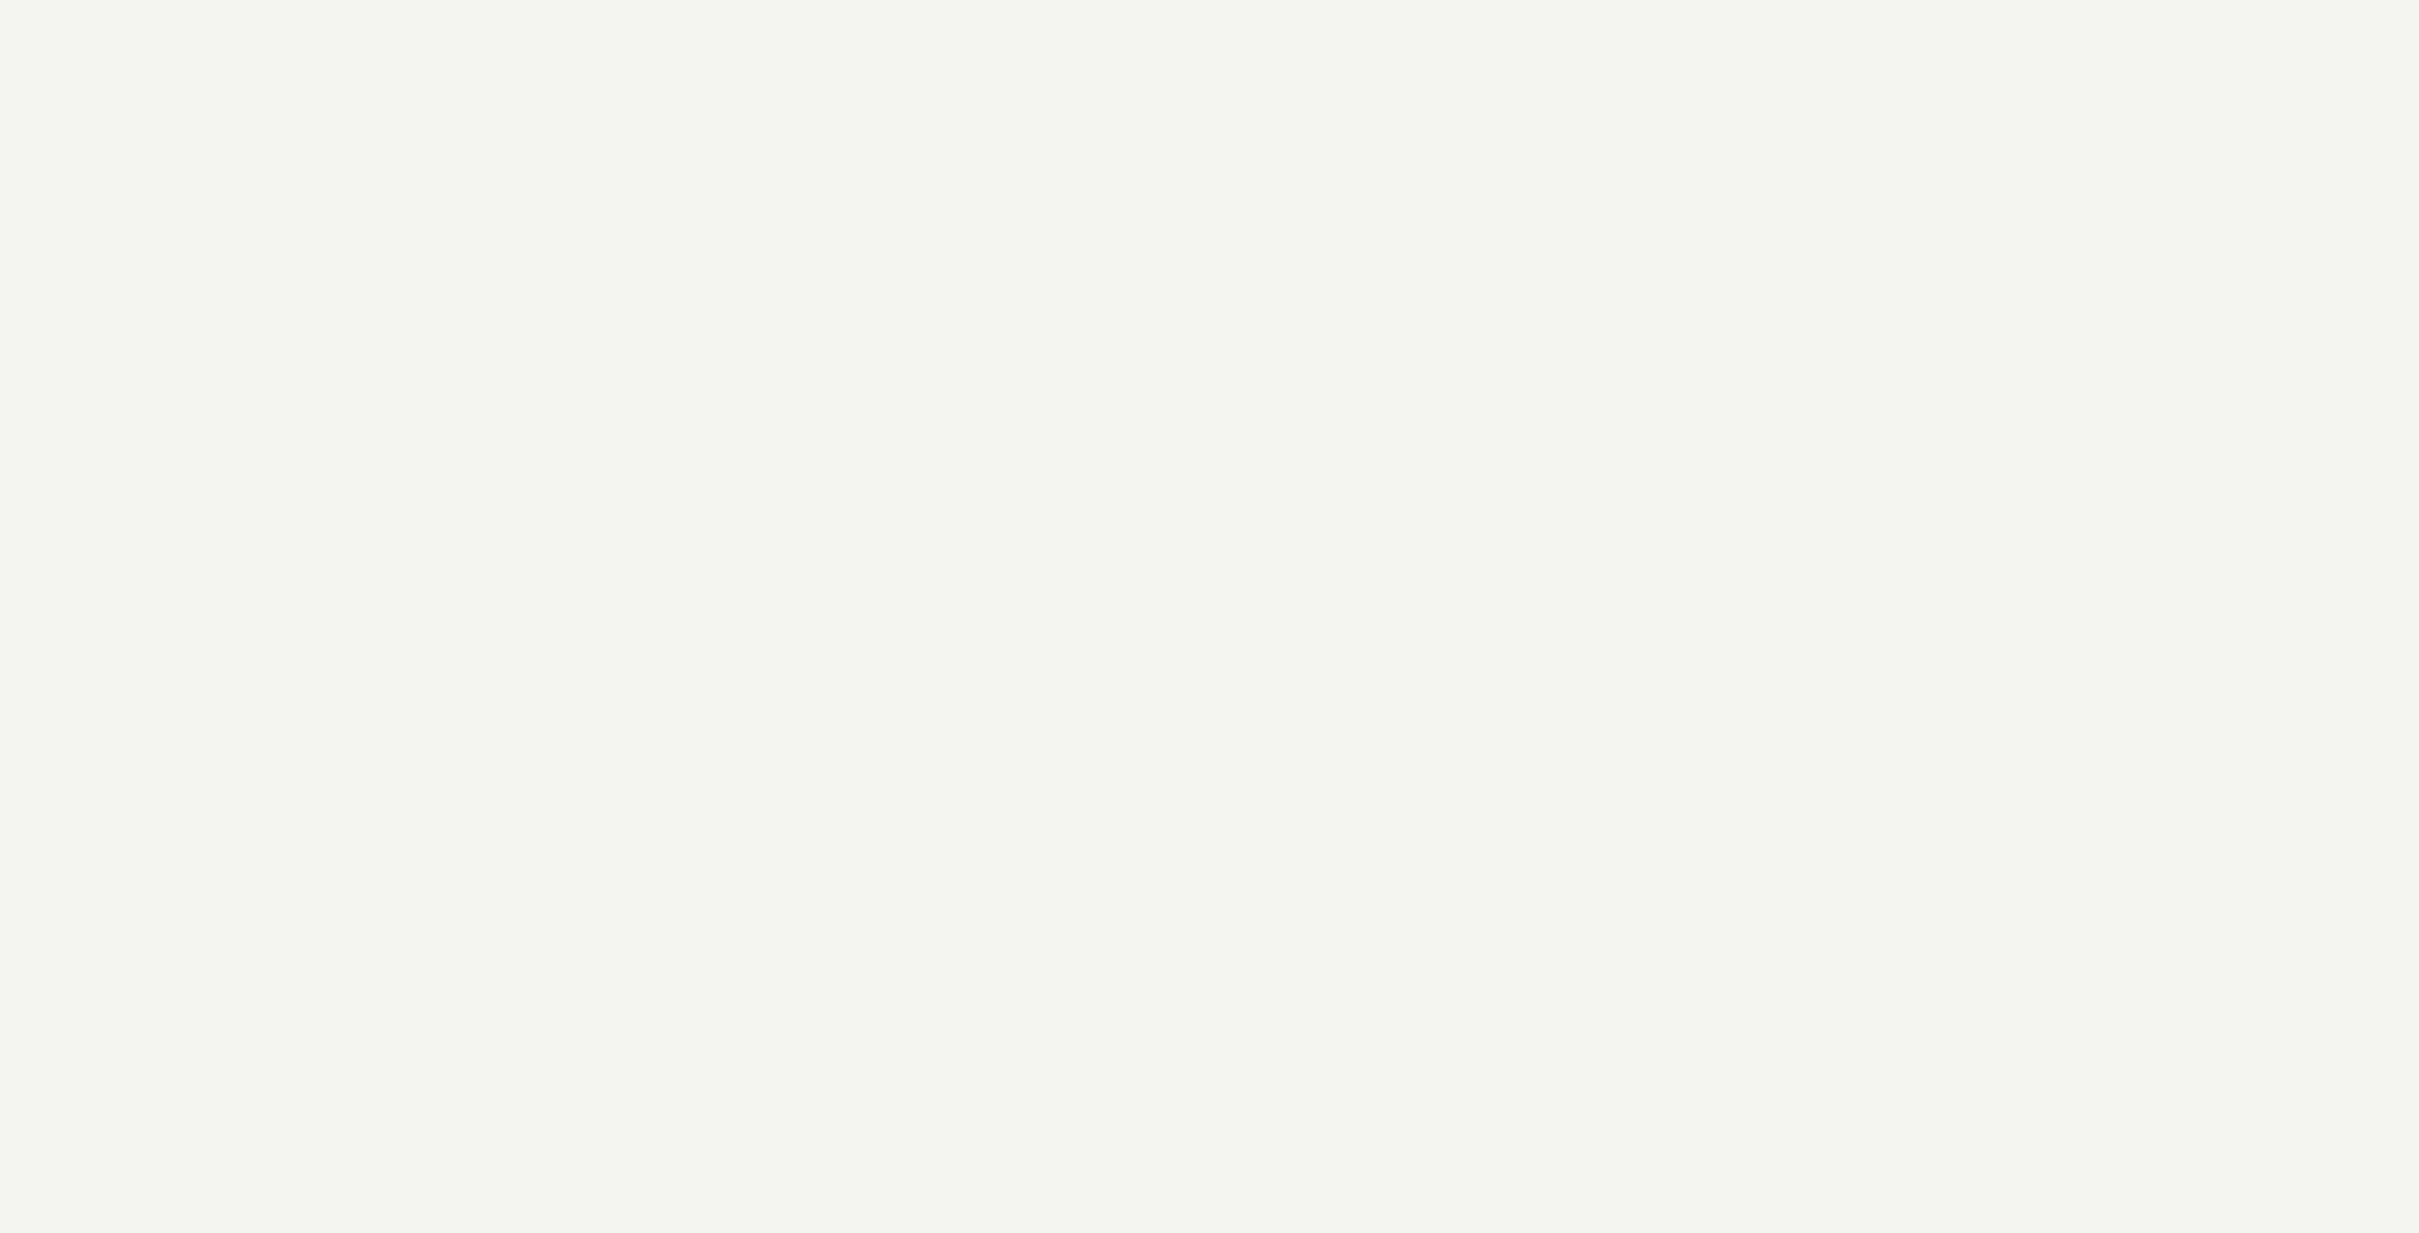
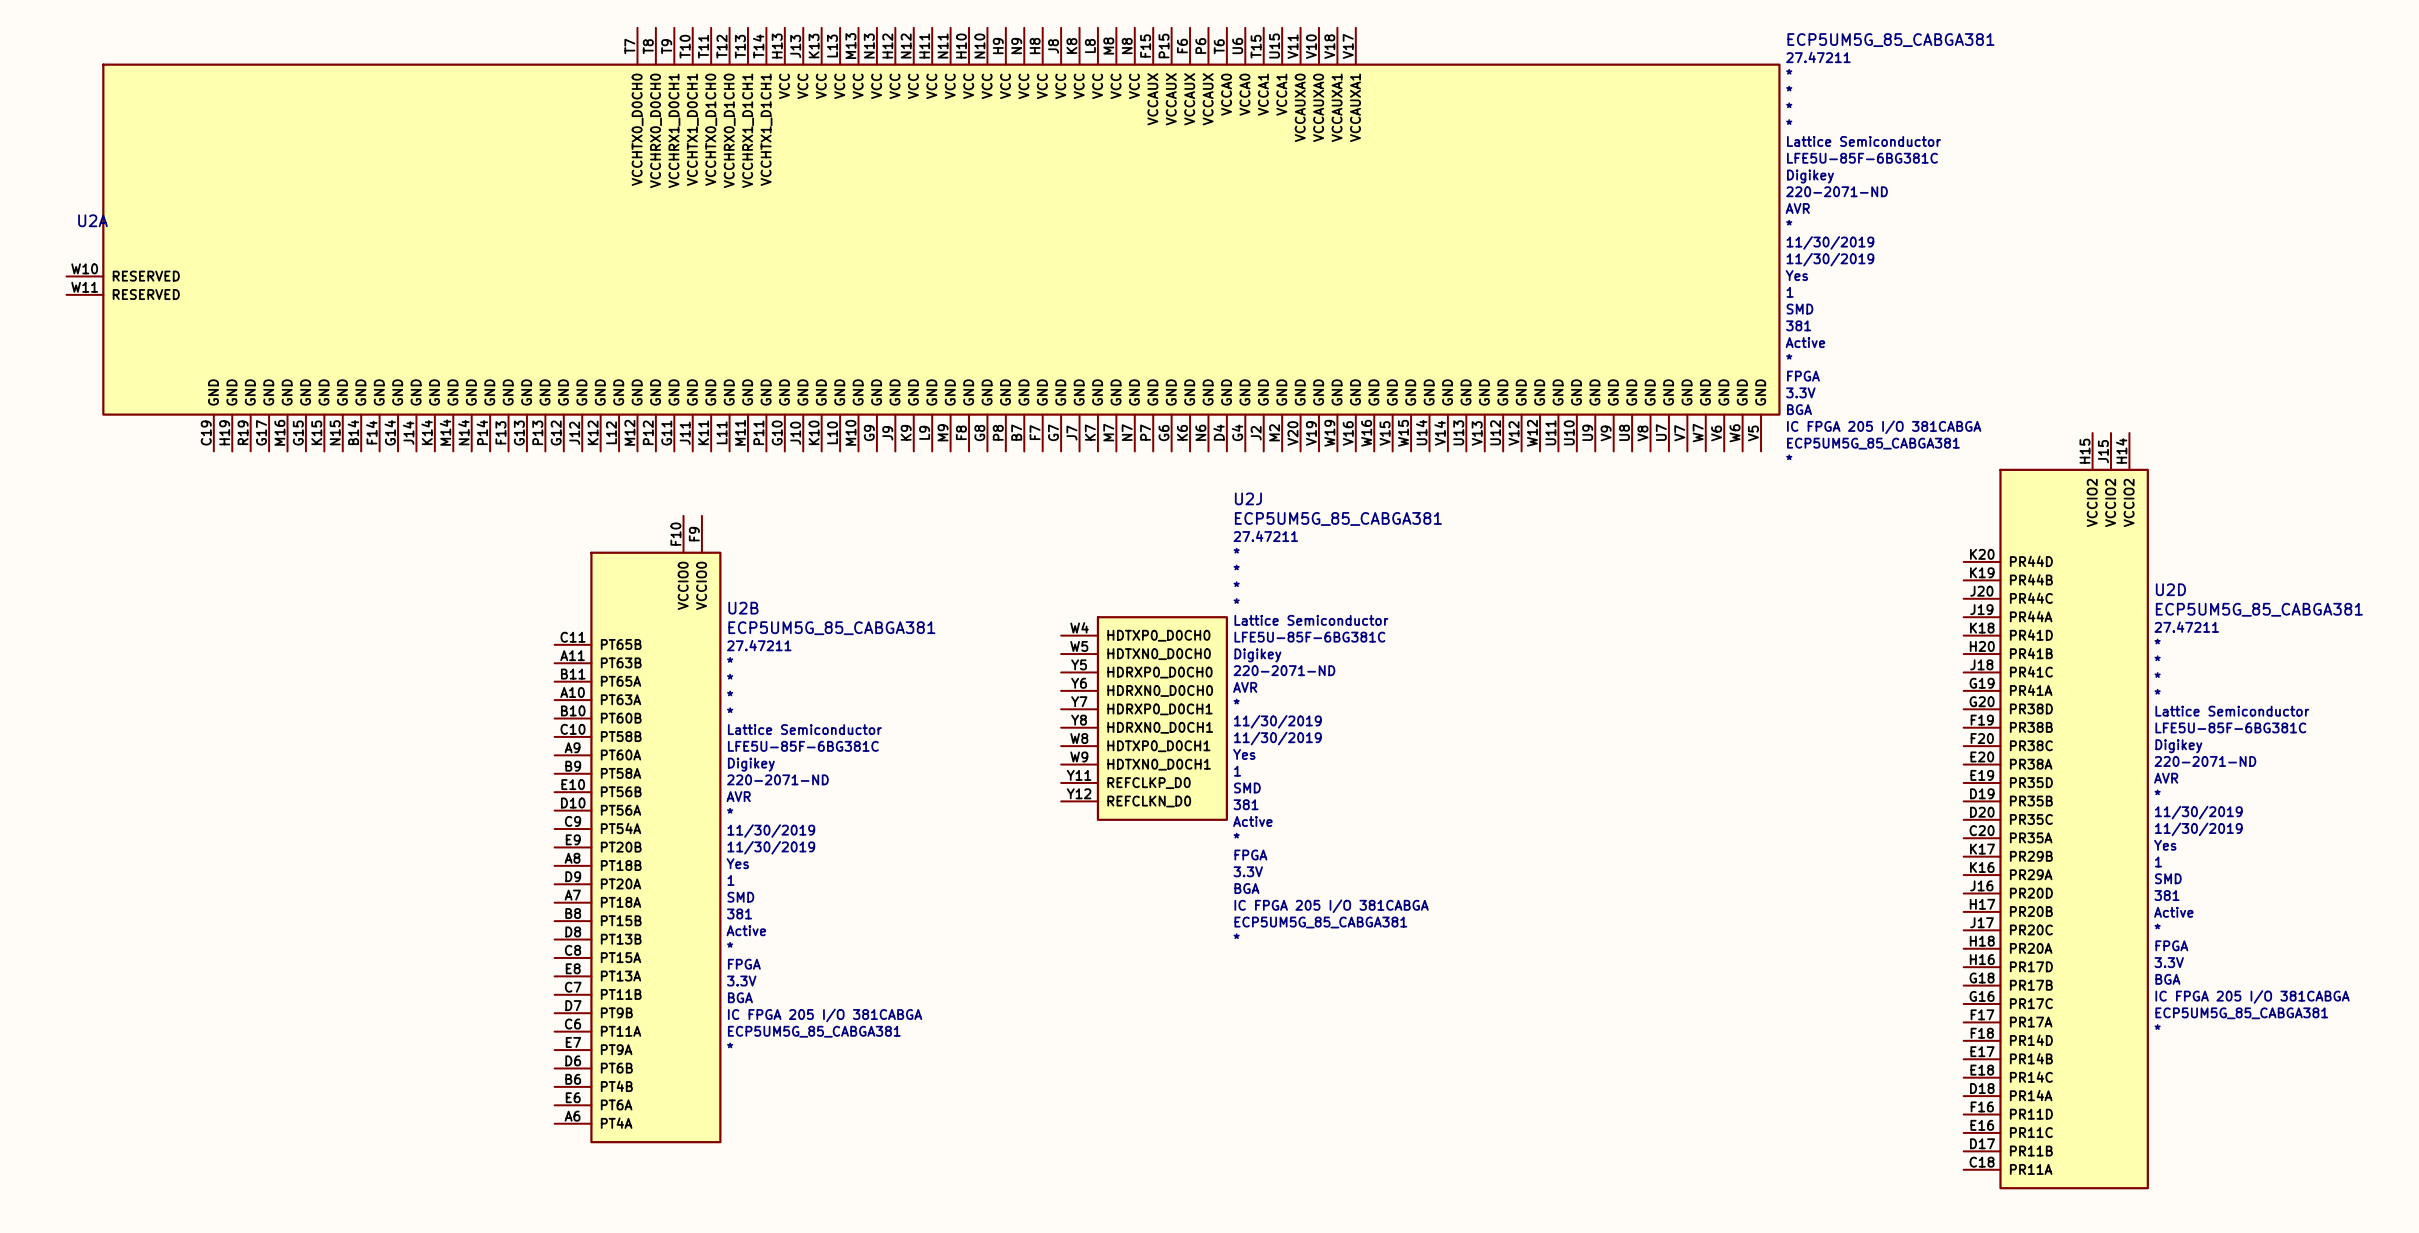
U2A: none -> ECP5UM5G_85_CABGA381 (923, 239)
U2J: none -> ECP5UM5G_85_CABGA381 (1144, 718)
U2D: none -> ECP5UM5G_85_CABGA381 (2056, 811)
U2B: none -> ECP5UM5G_85_CABGA381 (638, 829)

